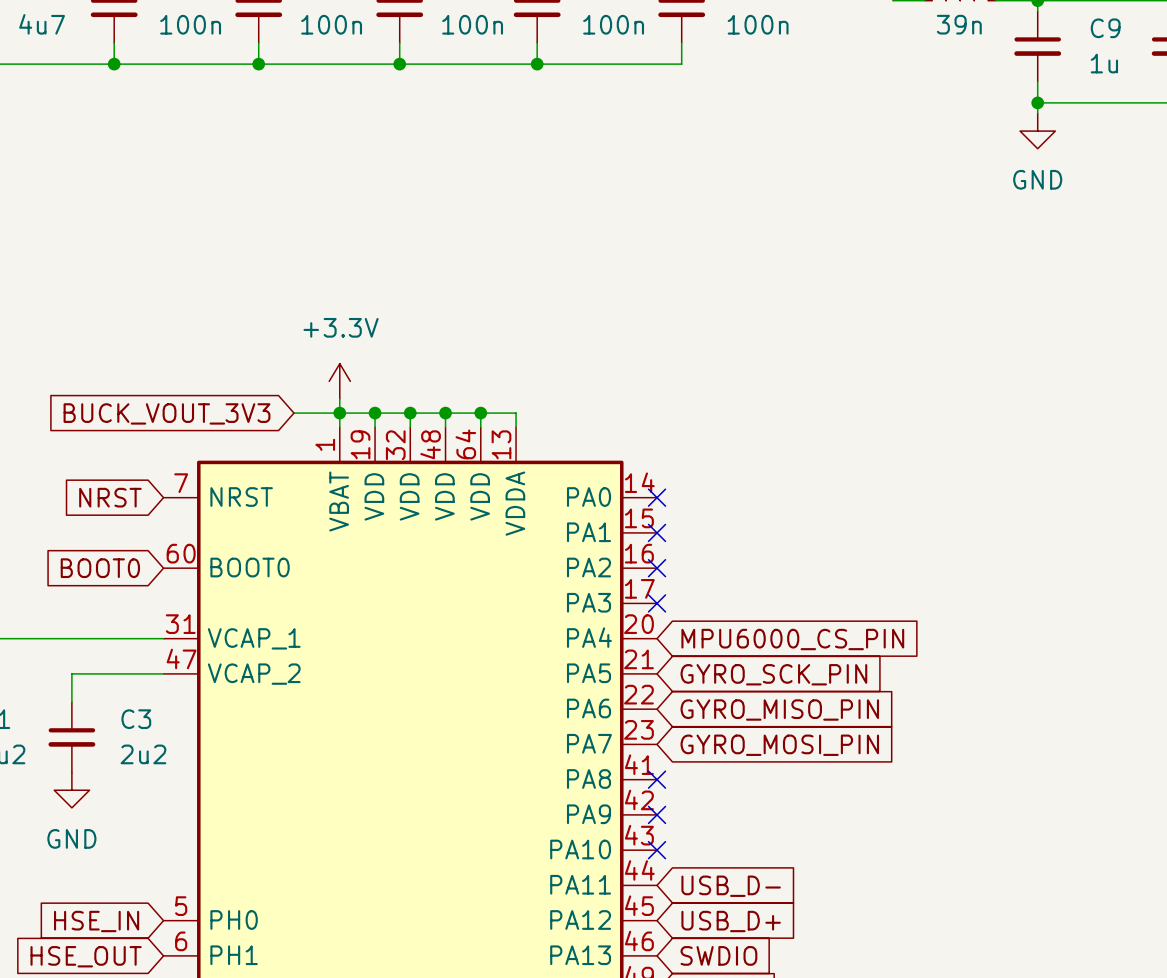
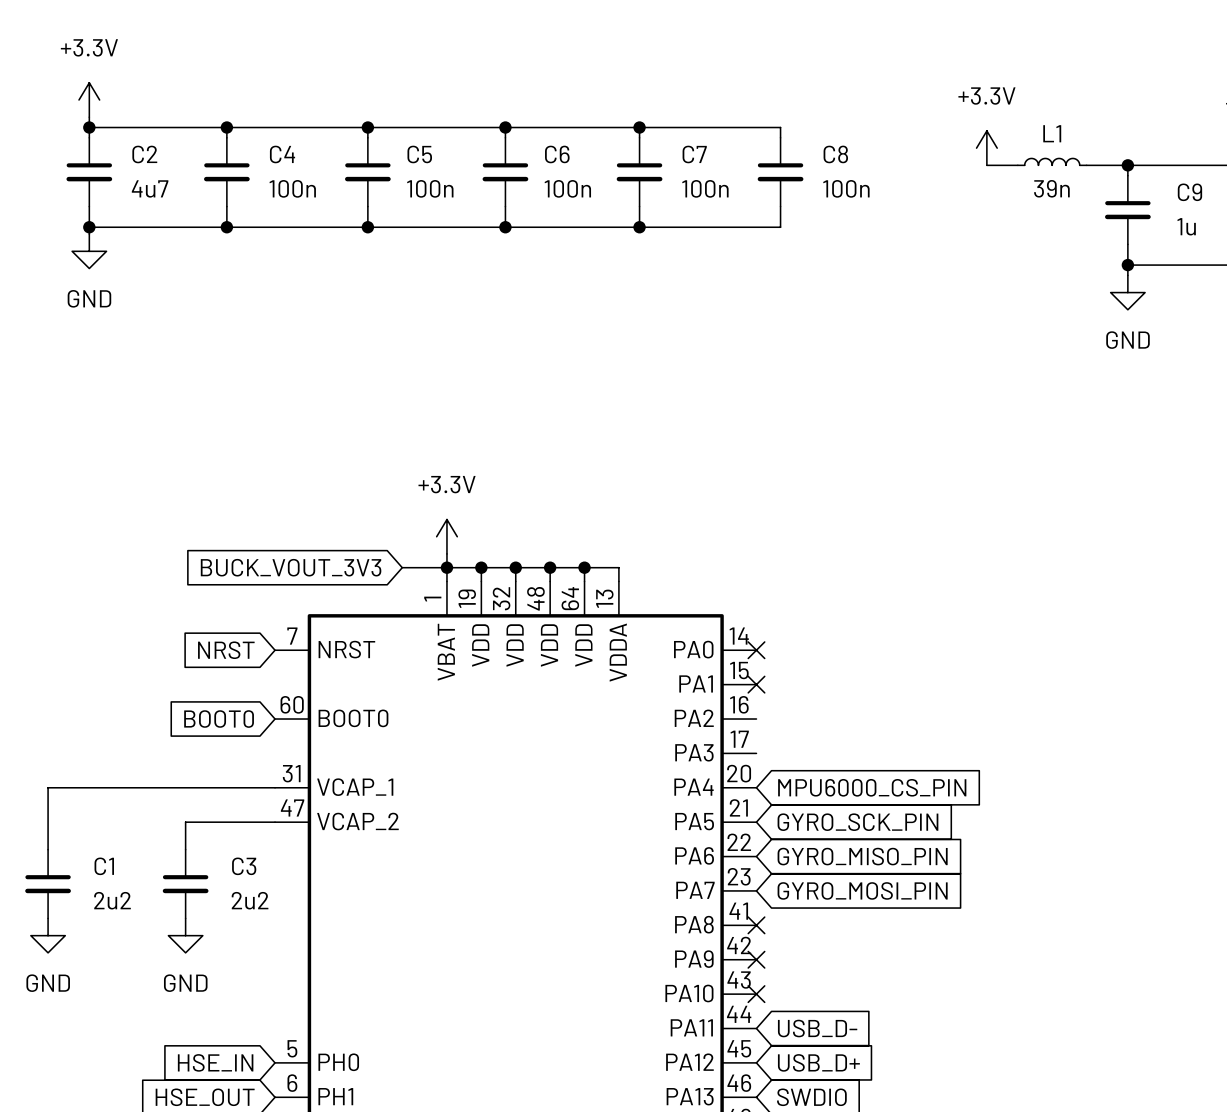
no-connect mark: (657, 568) -> none
no-connect mark: (657, 603) -> none

